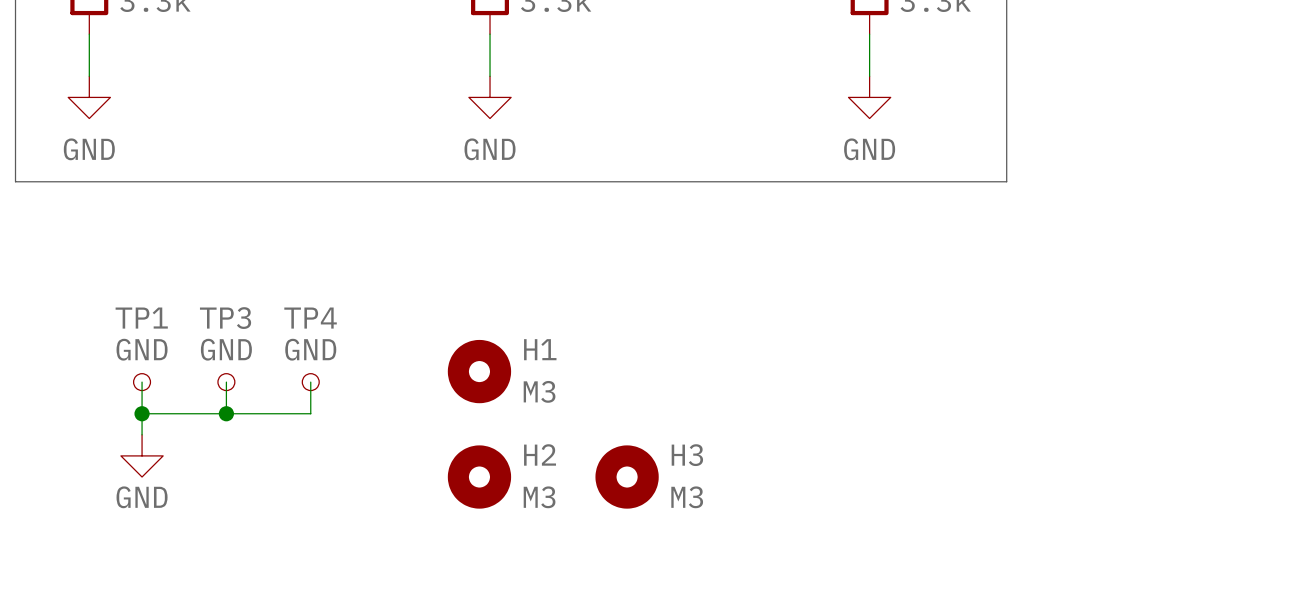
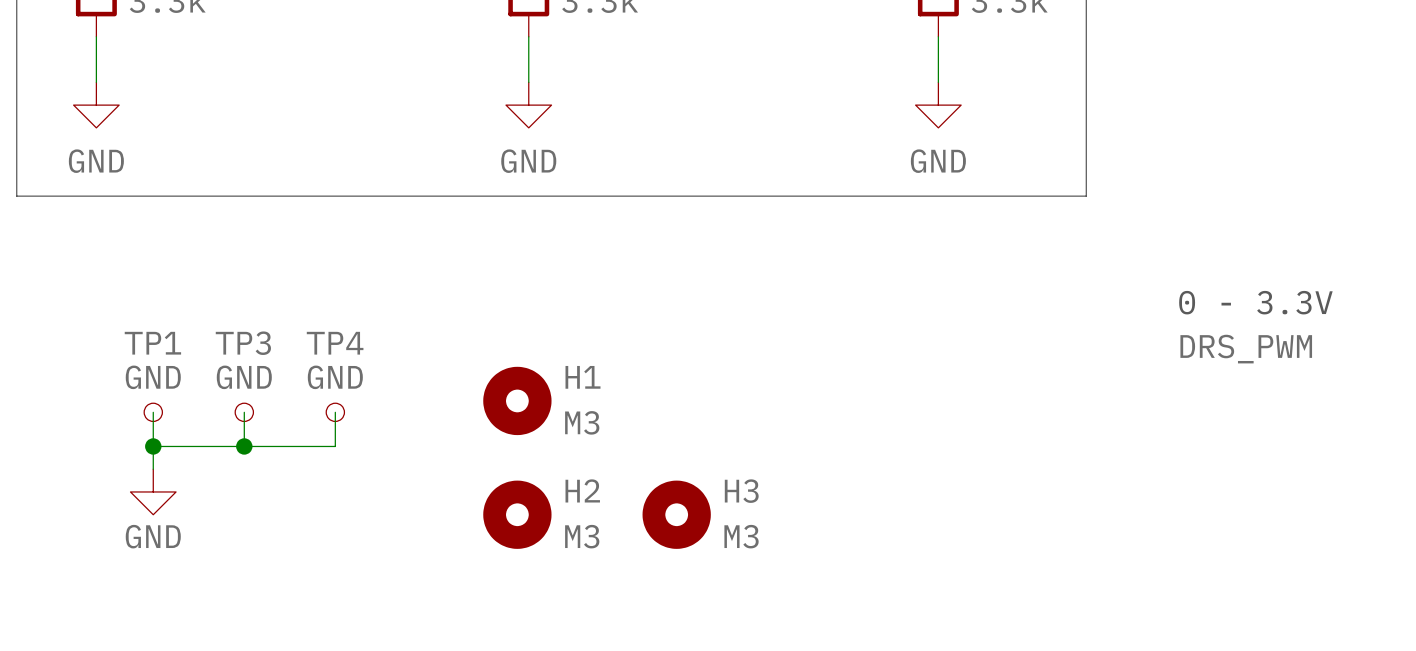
text: none -> 0 - 3.3V (1255, 302)
label: none -> DRS_PWM (1246, 349)

